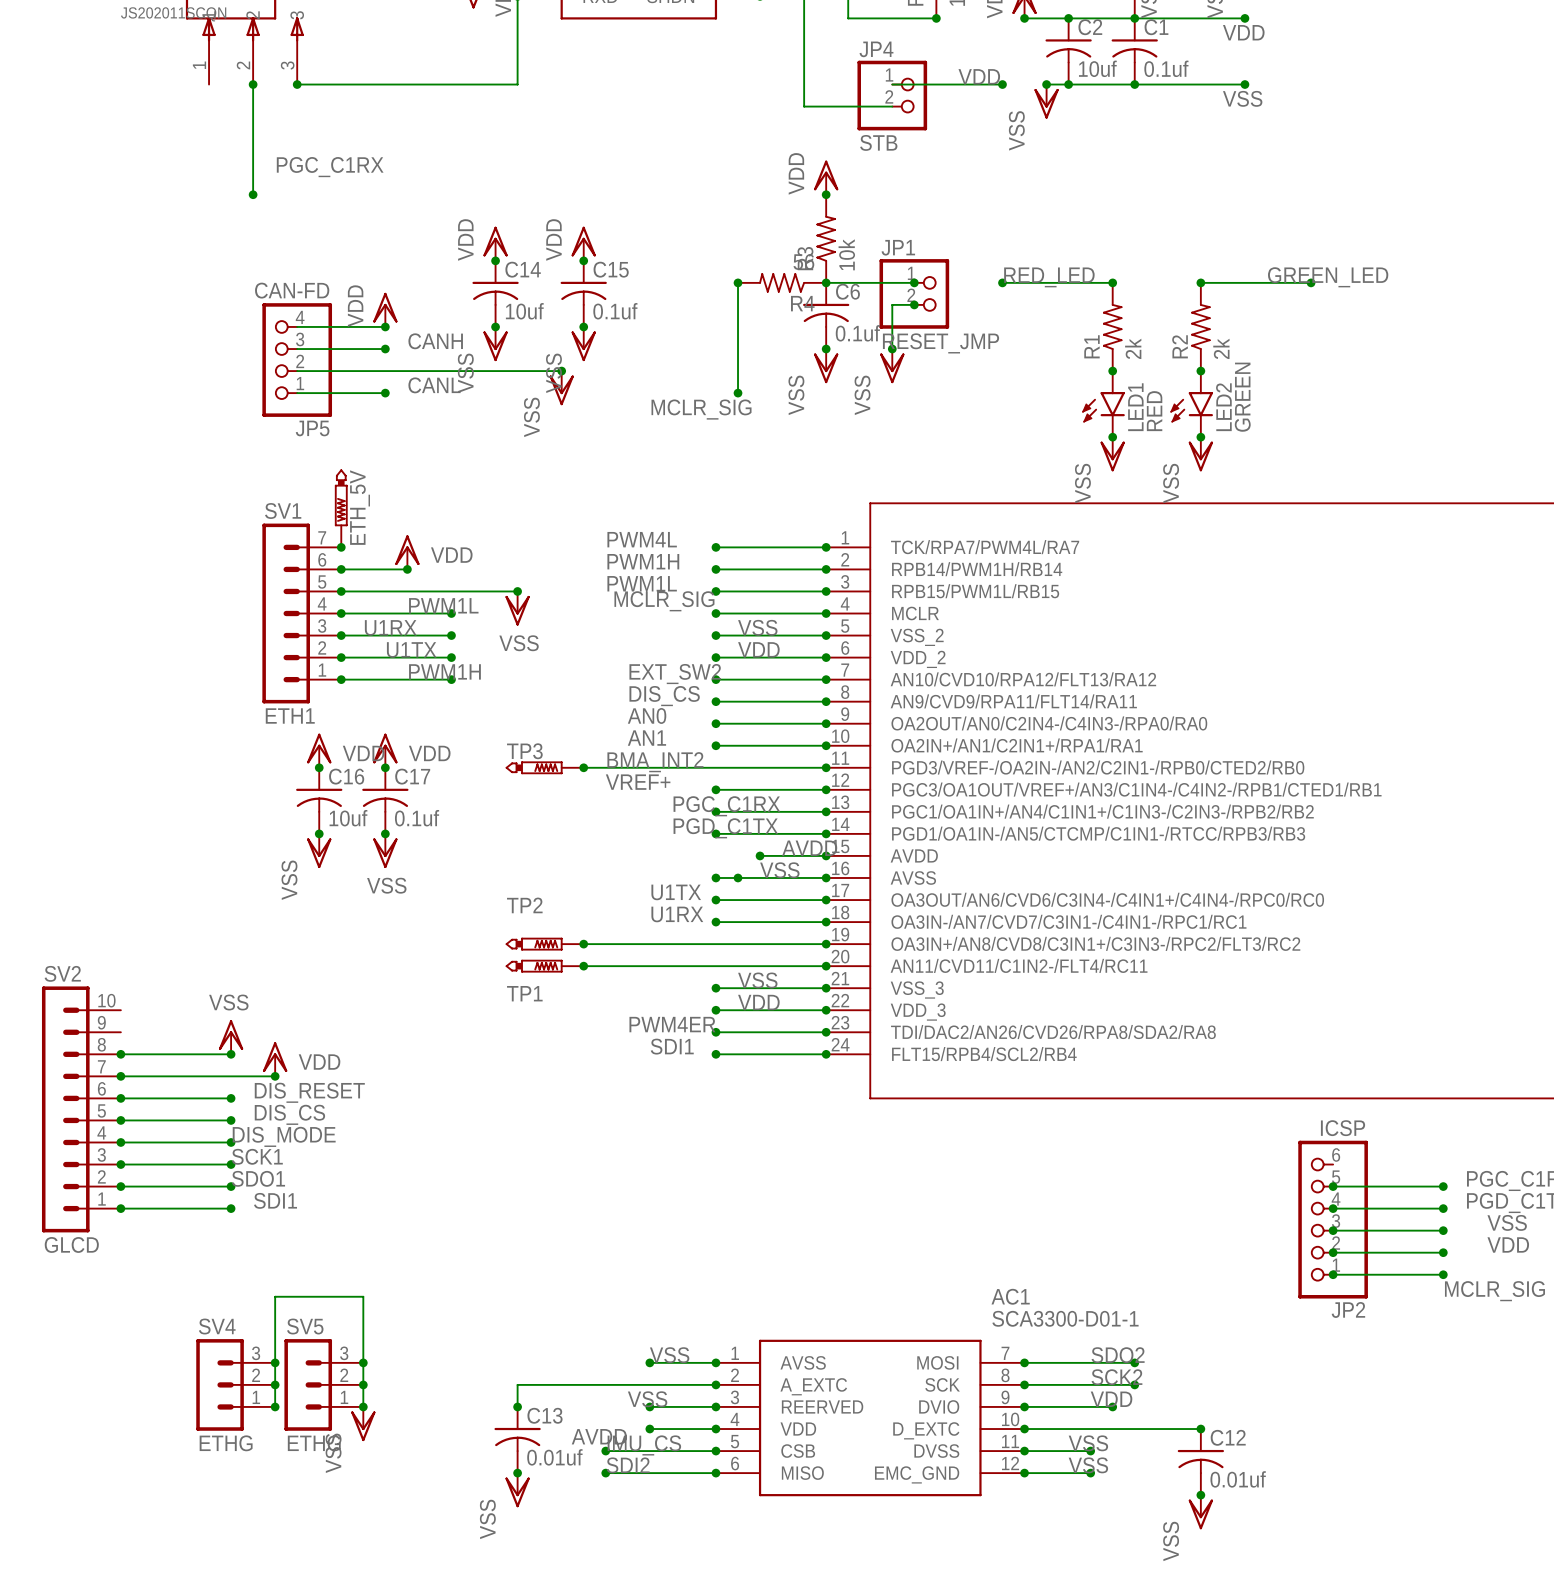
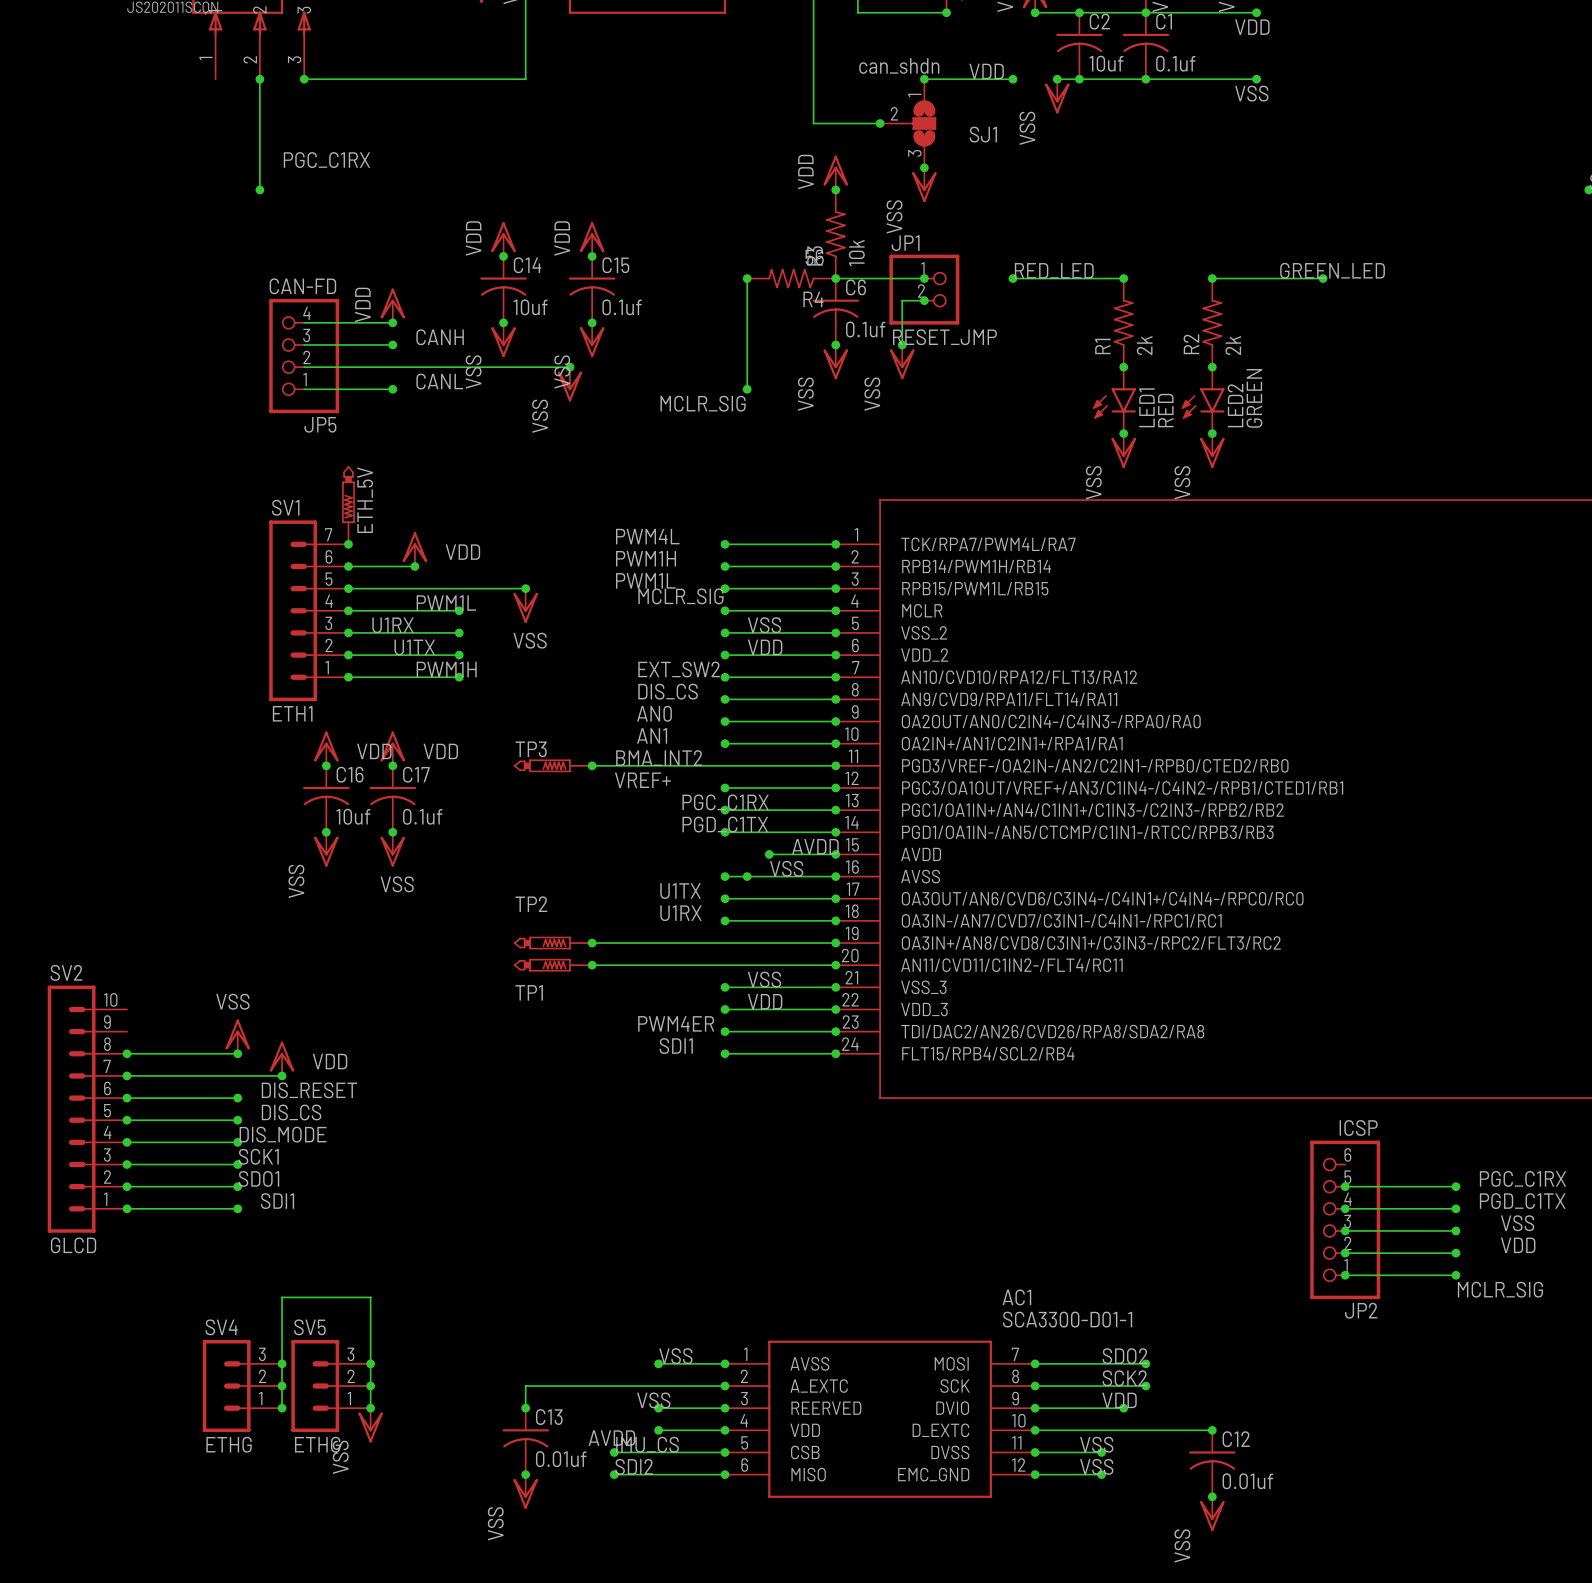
wire: (892, 84) (914, 84) -> none
junction: none -> (924, 79)
JP4: STB (892, 95) -> none
wire: (804, 106) (892, 106) -> (813, 101) (813, 123) (880, 123)
junction: none -> (880, 123)
SJ1: none -> can_shdn (908, 123)
junction: none -> (924, 167)
power symbol: none -> VSS (924, 184)

